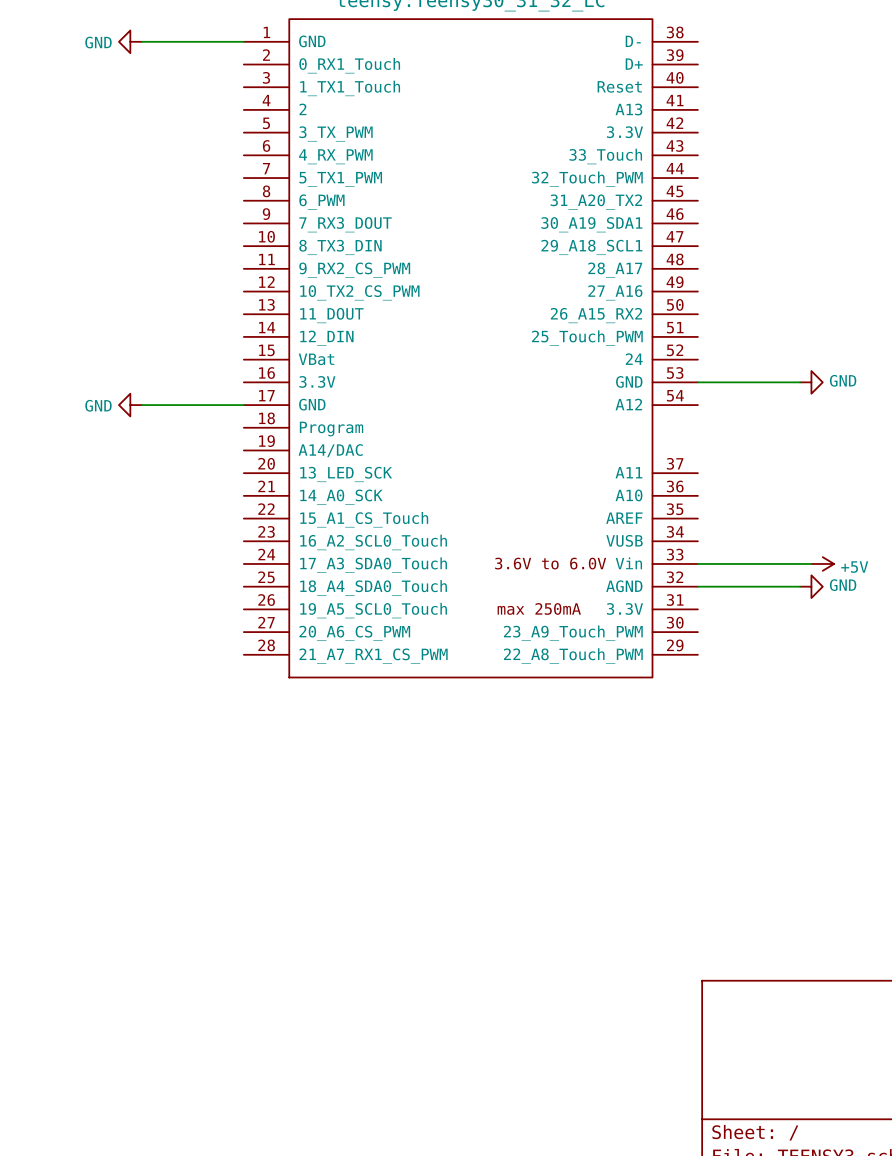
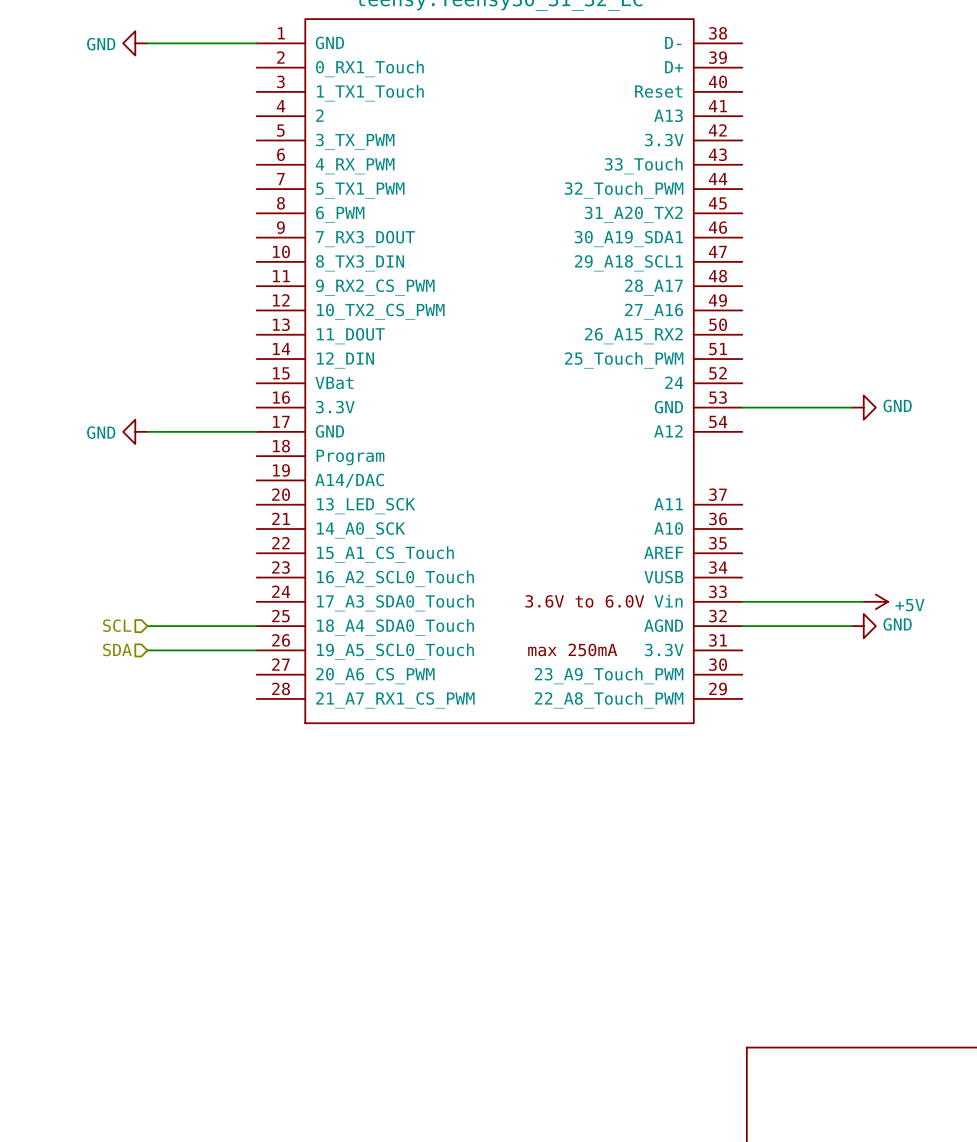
hierarchical label: none -> SCL (117, 625)
wire: none -> (147, 626) (256, 626)
hierarchical label: none -> SDA (117, 649)
wire: none -> (147, 650) (256, 650)

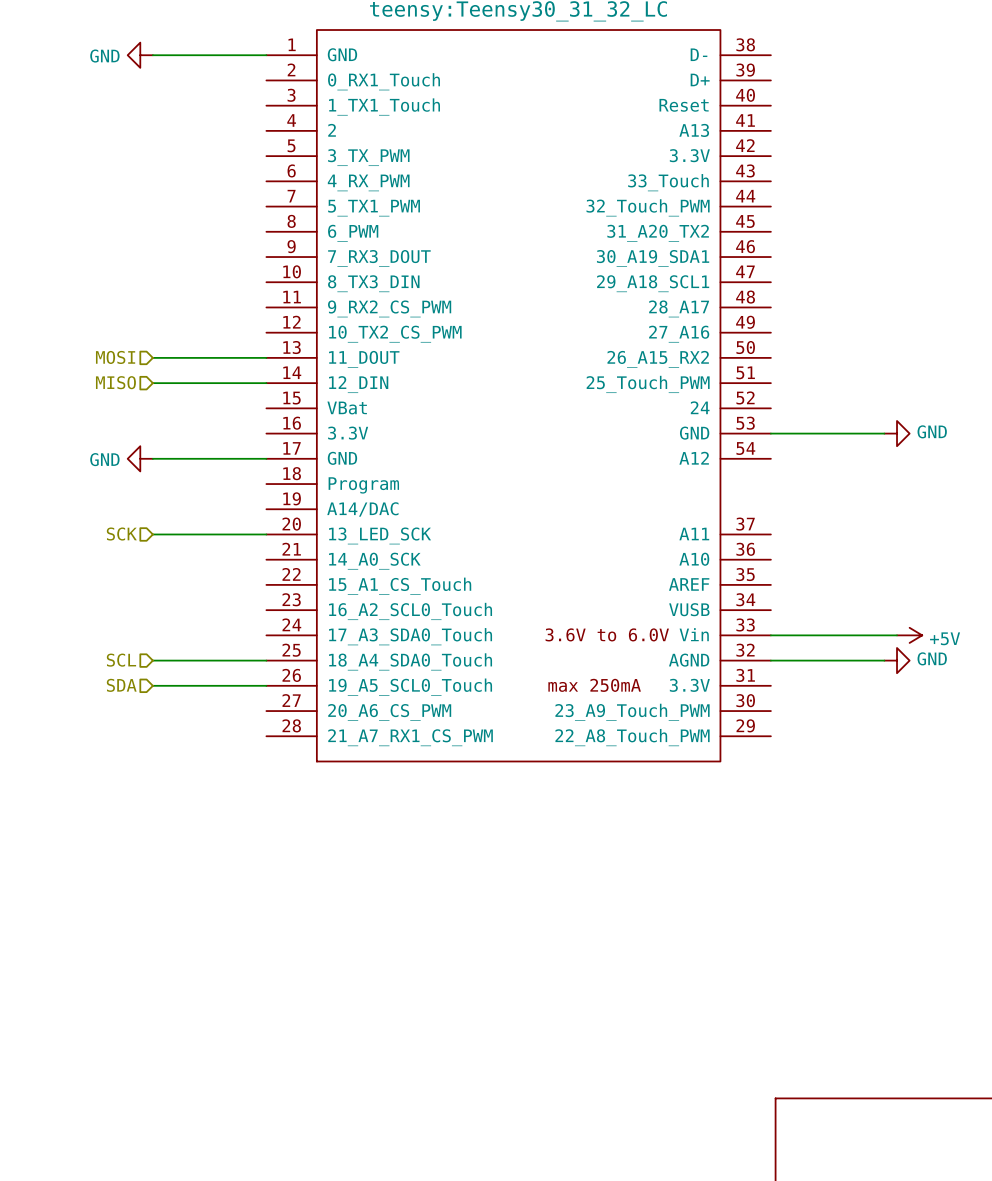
hierarchical label: none -> MOSI (115, 357)
wire: none -> (152, 357) (266, 357)
hierarchical label: none -> MISO (115, 382)
wire: none -> (152, 383) (266, 383)
hierarchical label: none -> SCK (121, 534)
wire: none -> (152, 534) (266, 534)

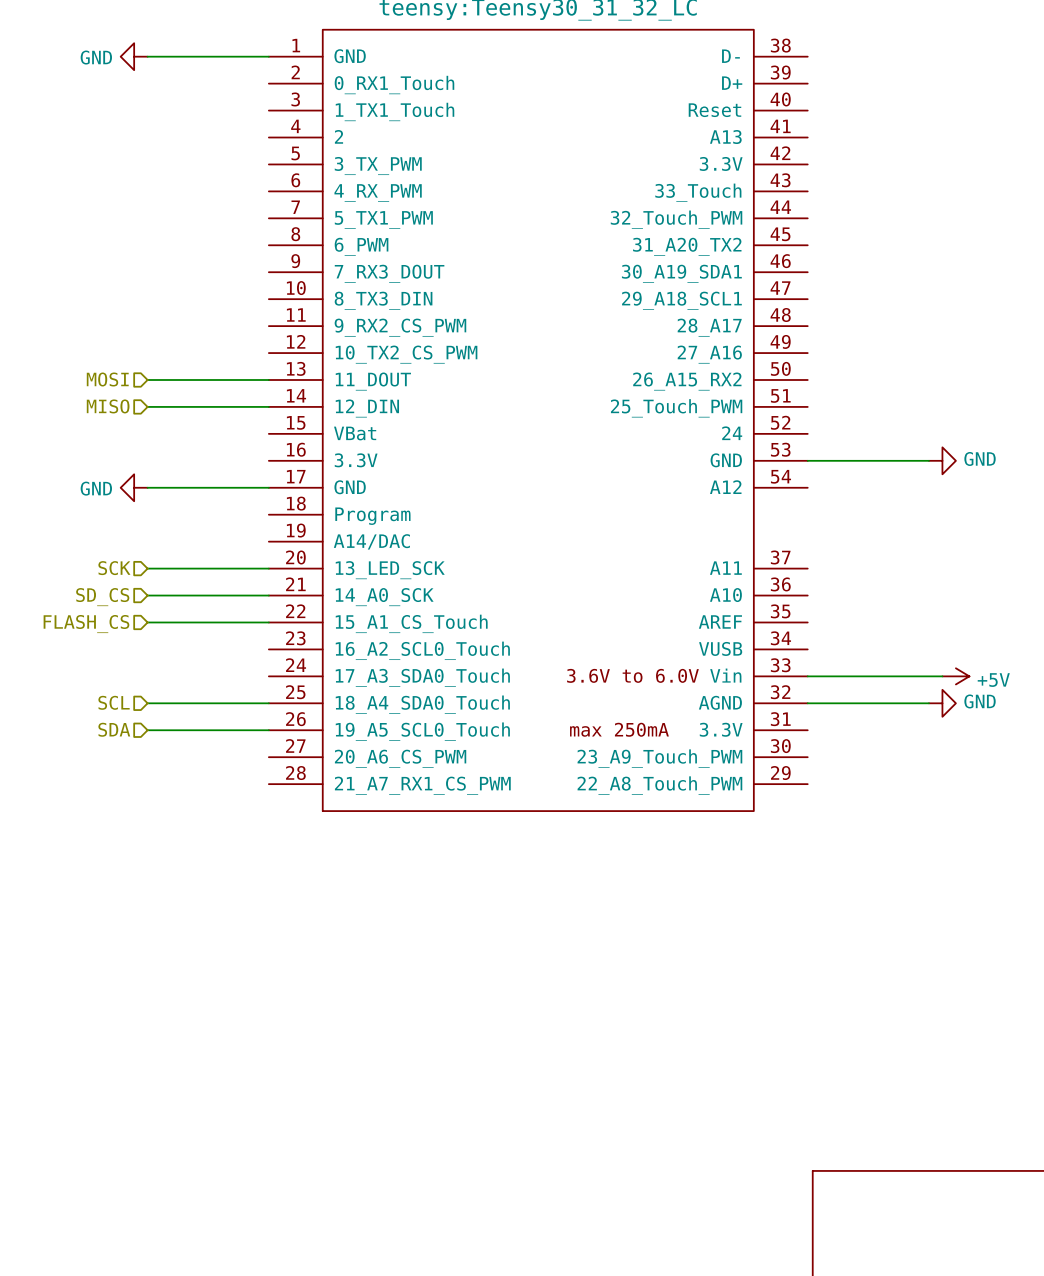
wire: none -> (147, 595) (268, 595)
hierarchical label: none -> SD_CS (102, 597)
wire: none -> (147, 622) (268, 622)
hierarchical label: none -> FLASH_CS (86, 624)

